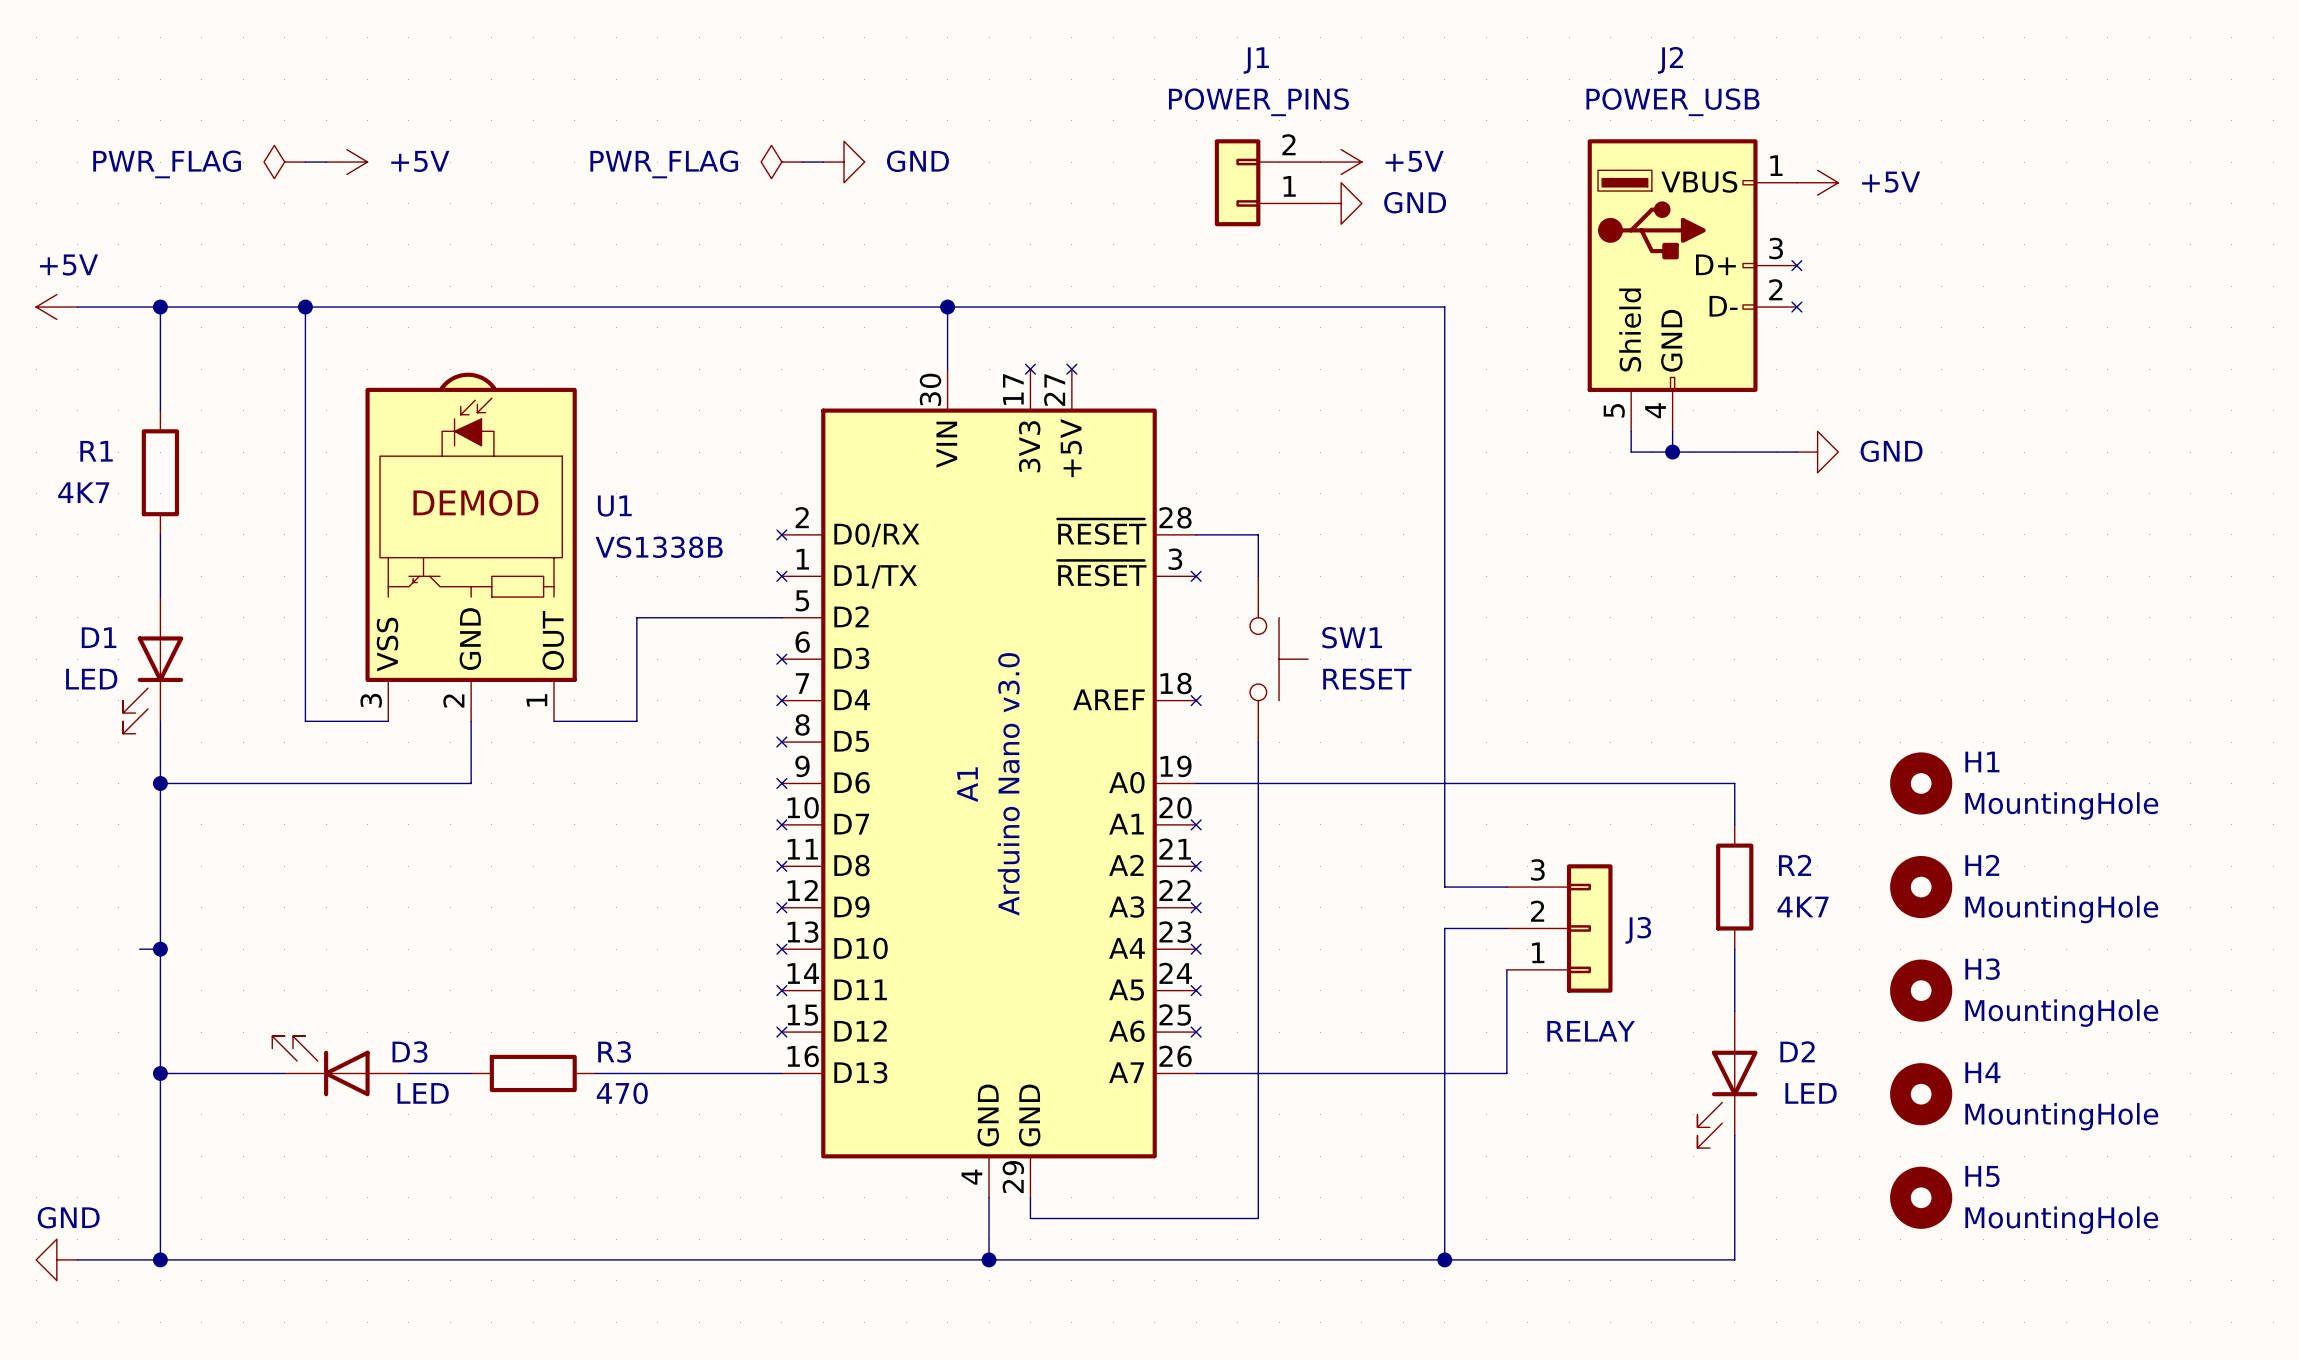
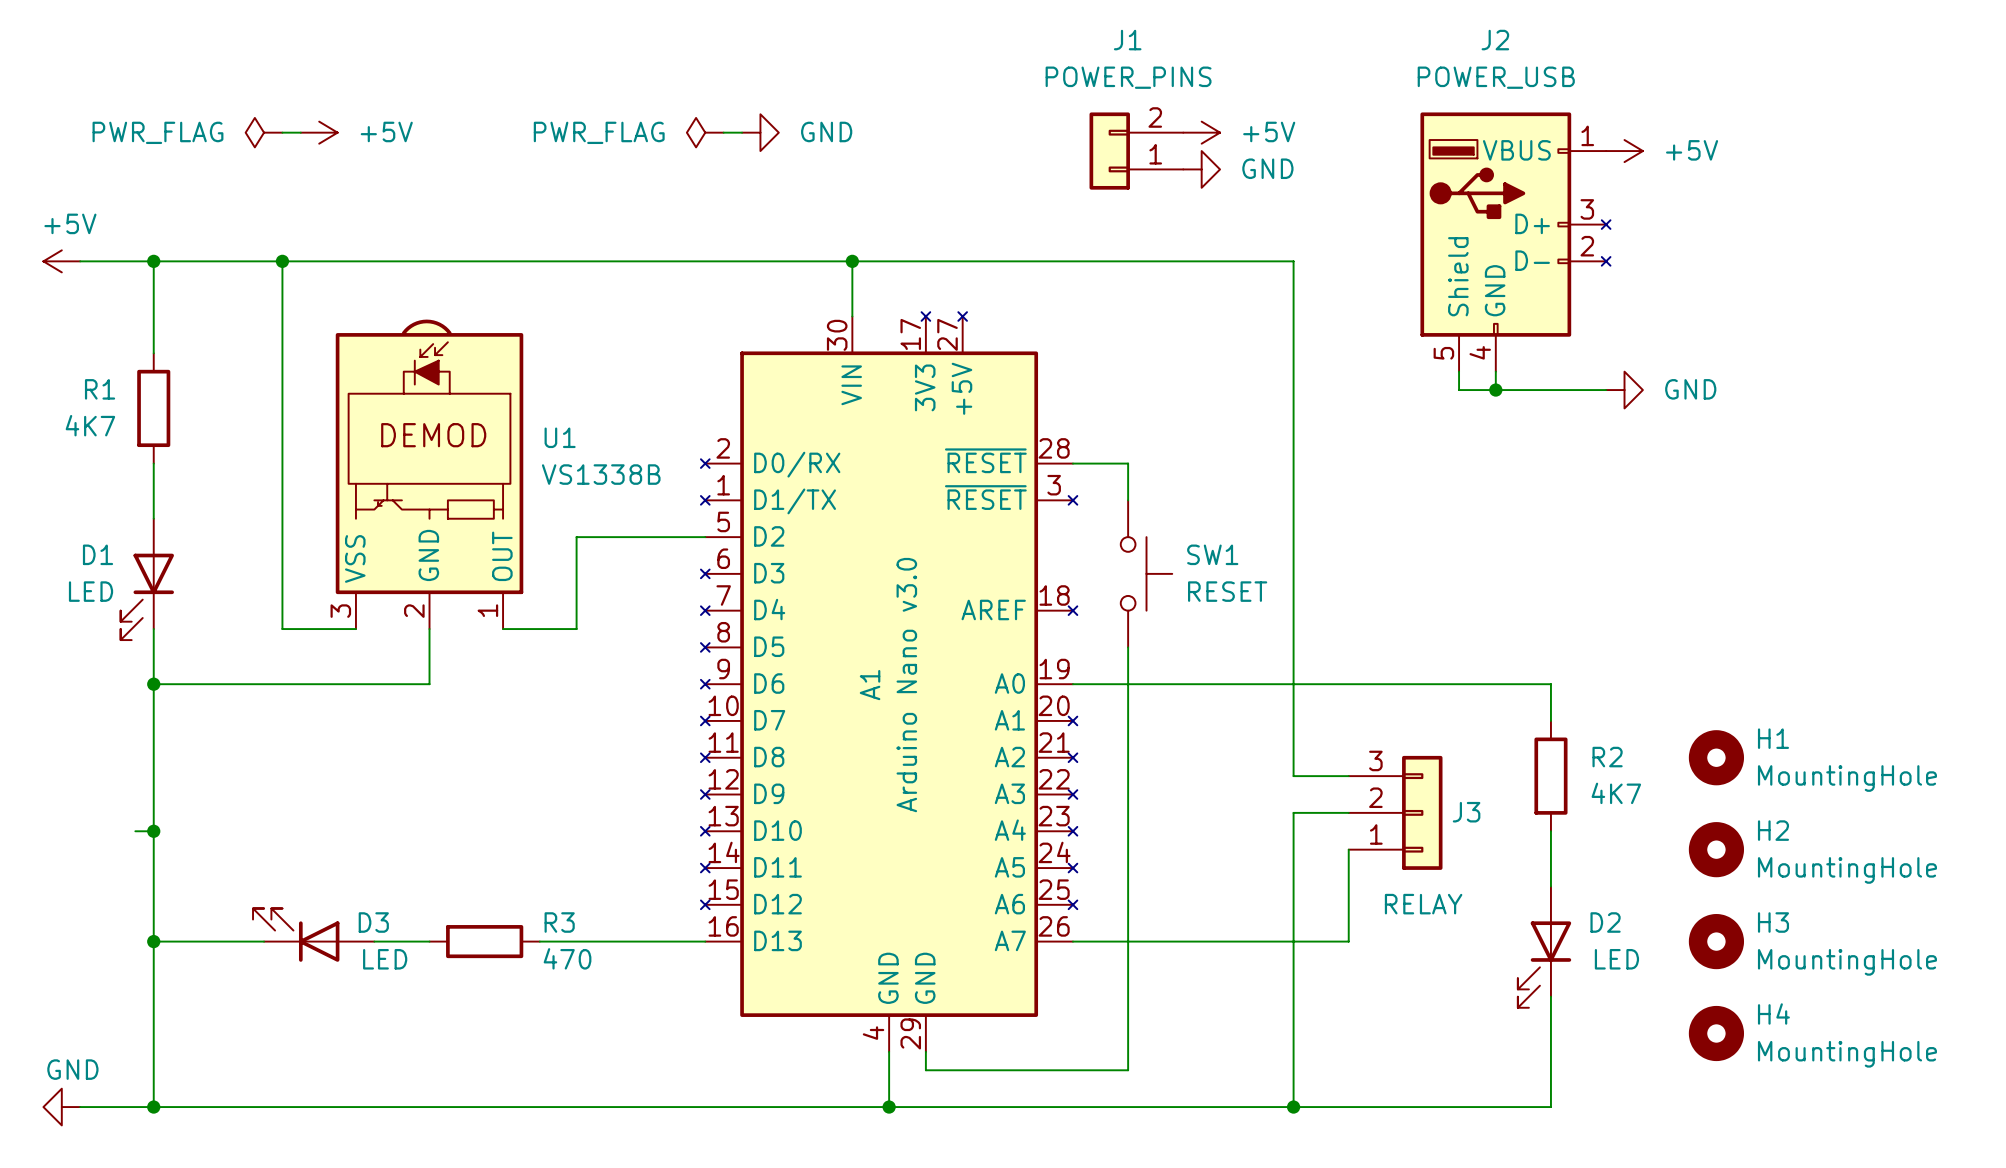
H1 position: (1921, 783) -> (1716, 757)
H2 position: (1921, 887) -> (1716, 849)
H3 position: (1921, 990) -> (1716, 941)
H4 position: (1921, 1094) -> (1716, 1033)
H5: MountingHole (1921, 1197) -> none

